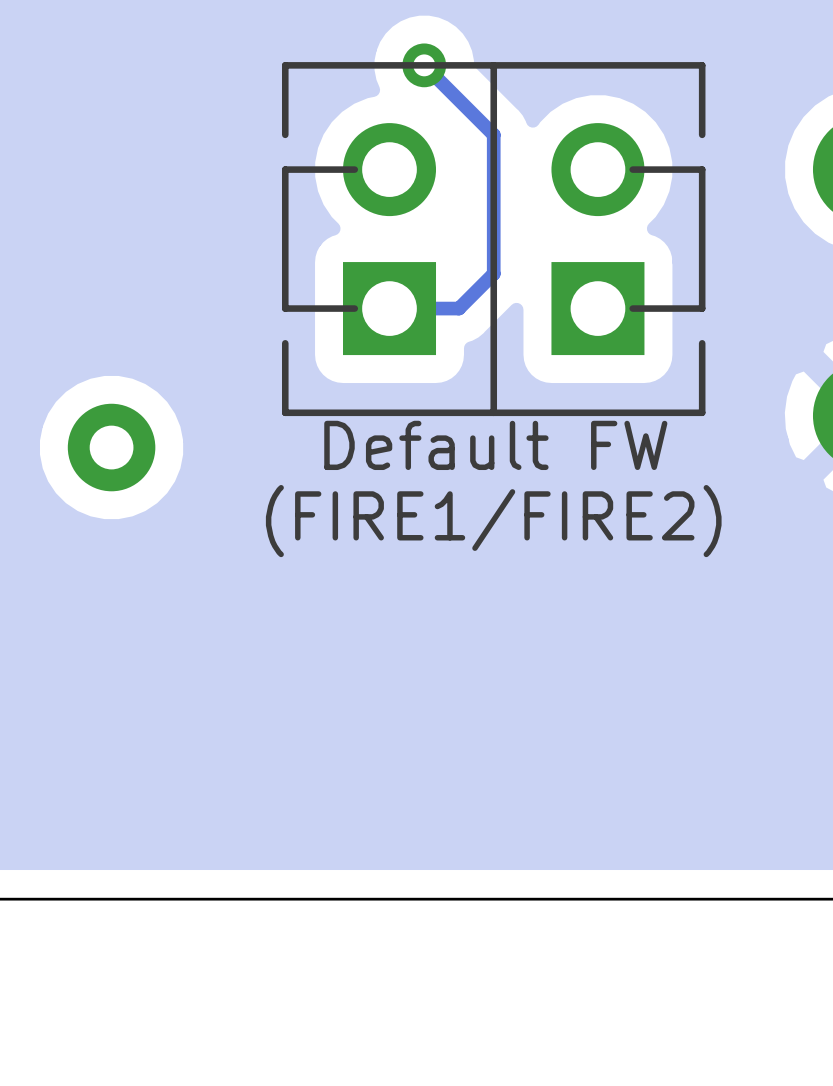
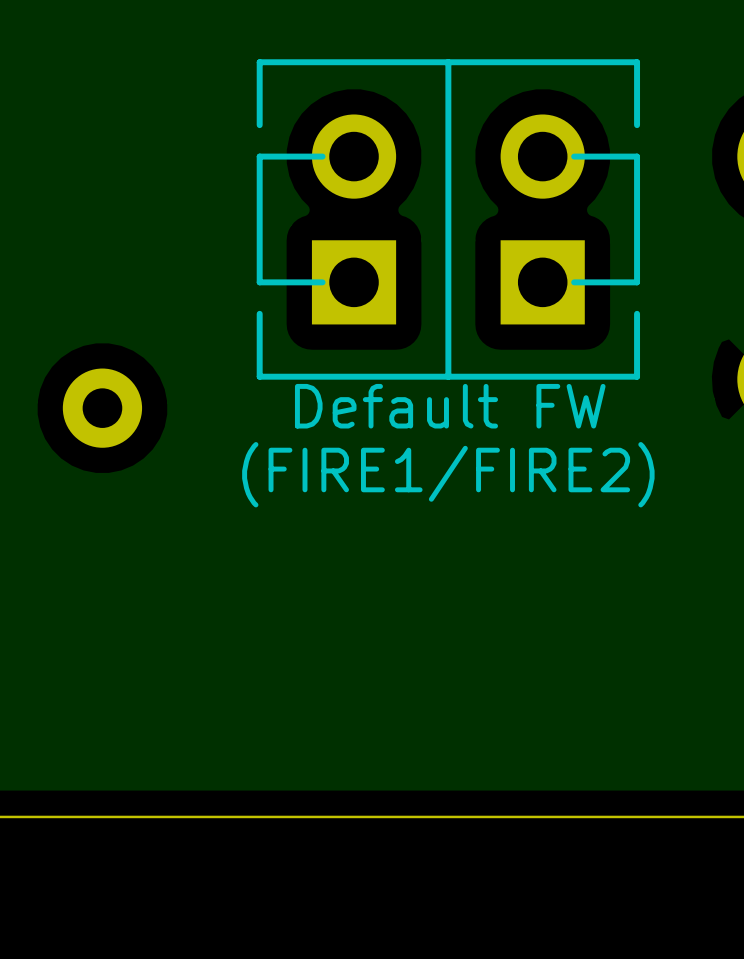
track: (424, 65) (493, 134) (493, 273) (458, 308) (389, 308) -> none
via: (424, 65) -> none

